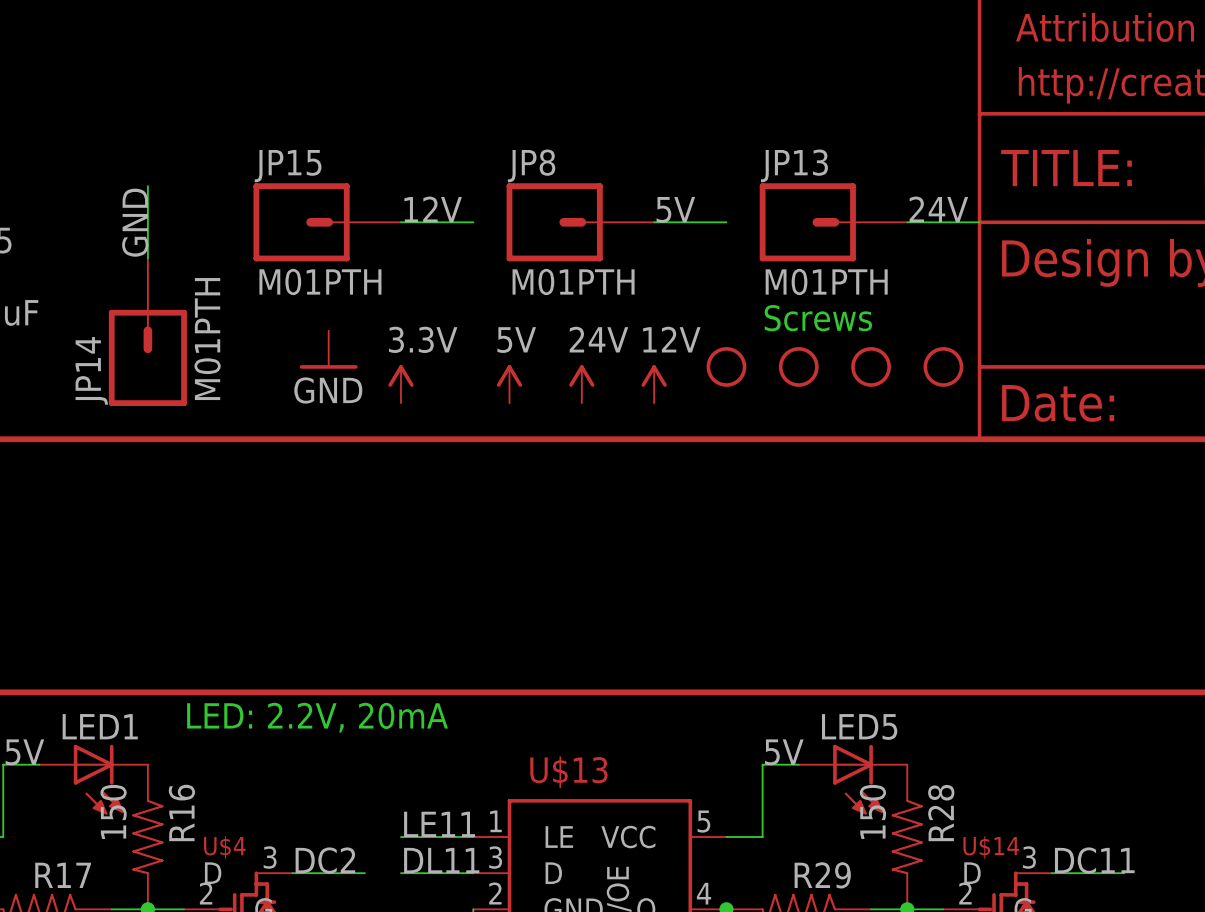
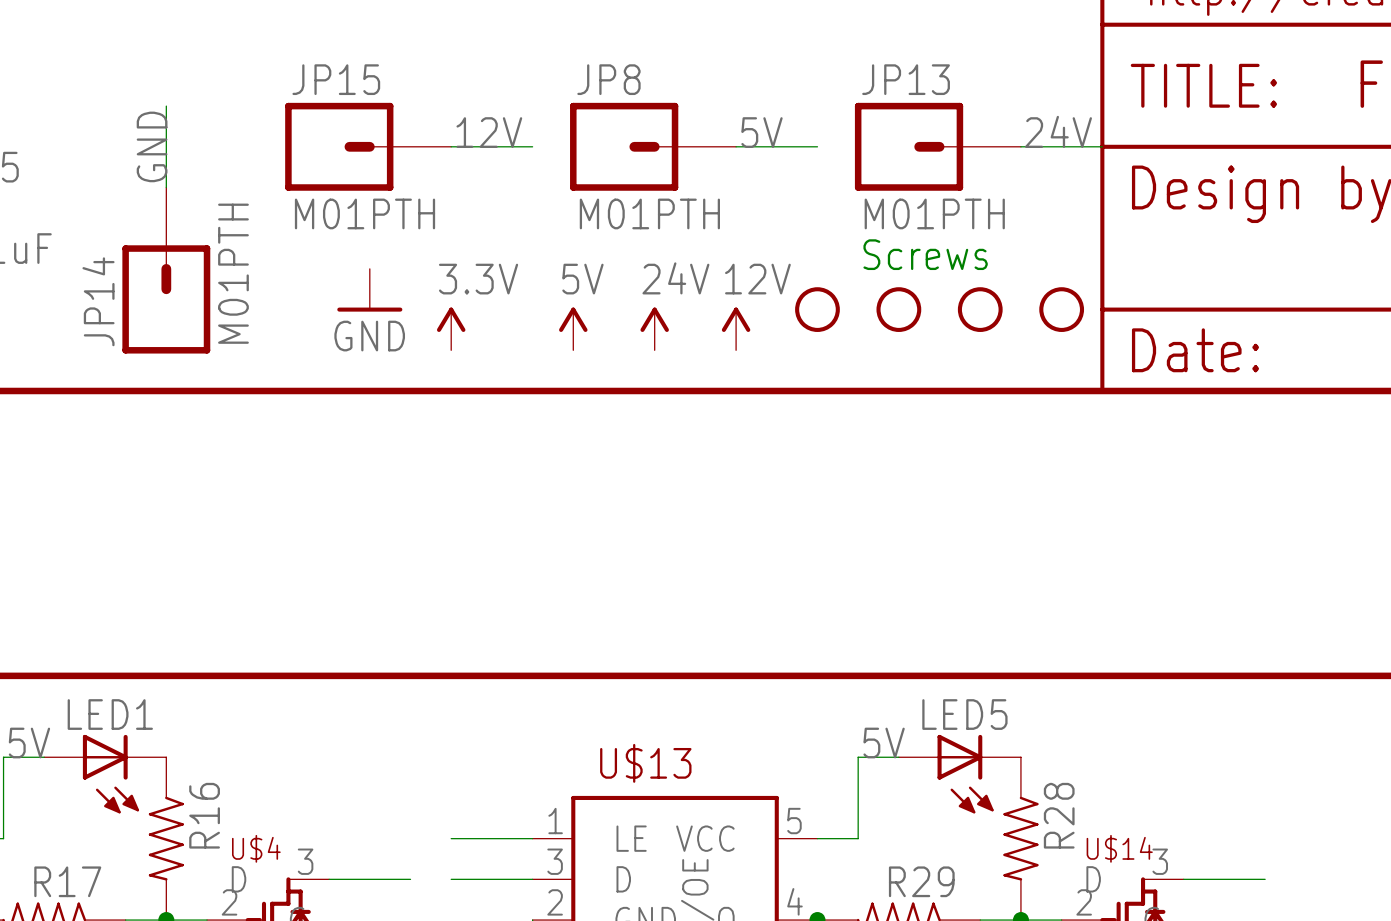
text: LED: 2.2V, 20mA (317, 717) -> none
R16 value: 150 (113, 811) -> none
R28 value: 150 (872, 811) -> none
label: LE11 (439, 824) -> none
label: DC2 (325, 860) -> none
label: DL11 (441, 860) -> none
label: DC11 (1094, 860) -> none

